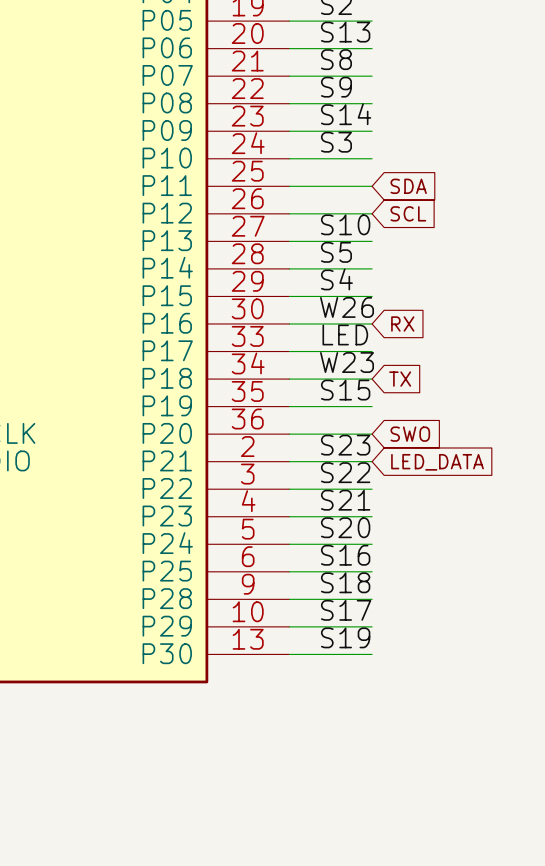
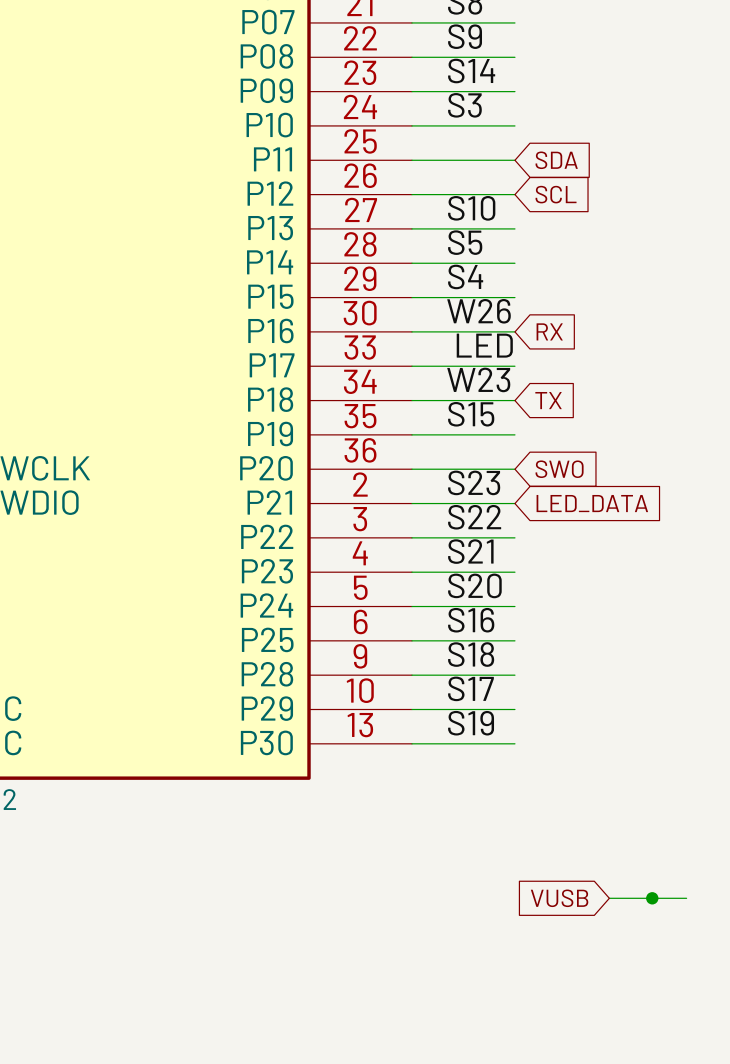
global label: none -> VUSB (559, 898)
wire: none -> (609, 898) (686, 898)
junction: none -> (652, 898)

